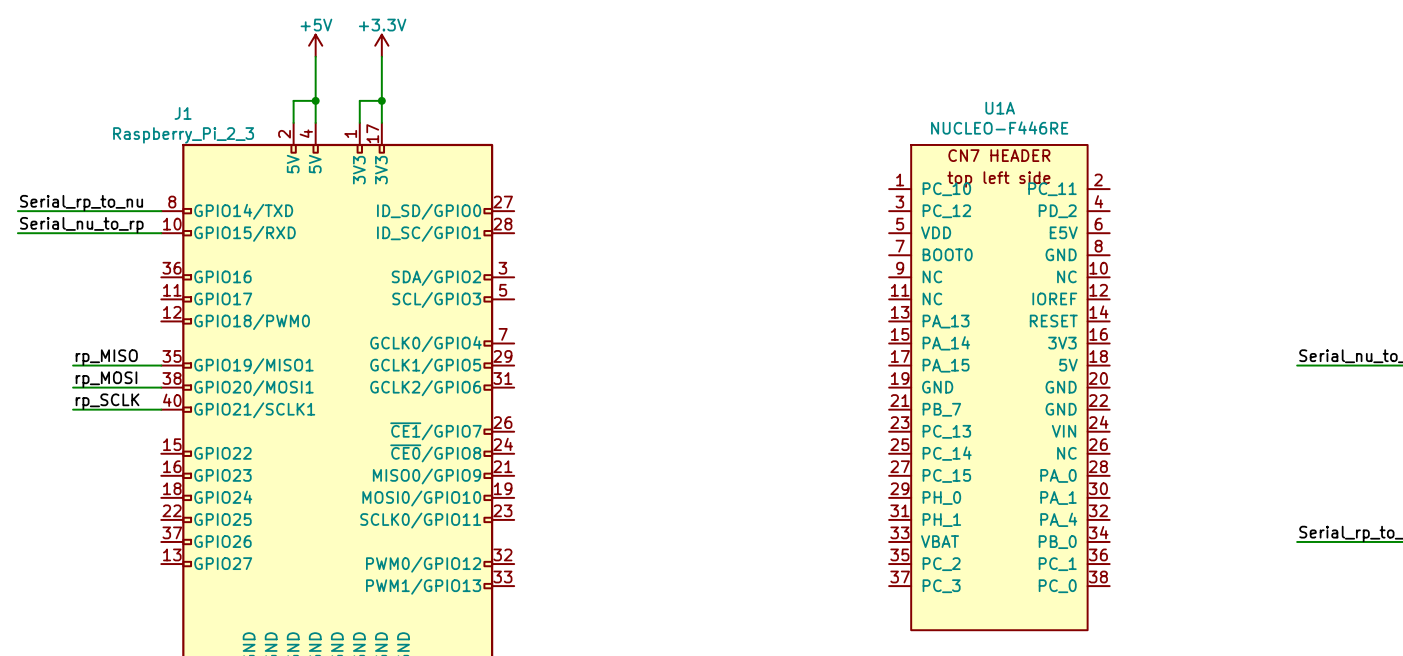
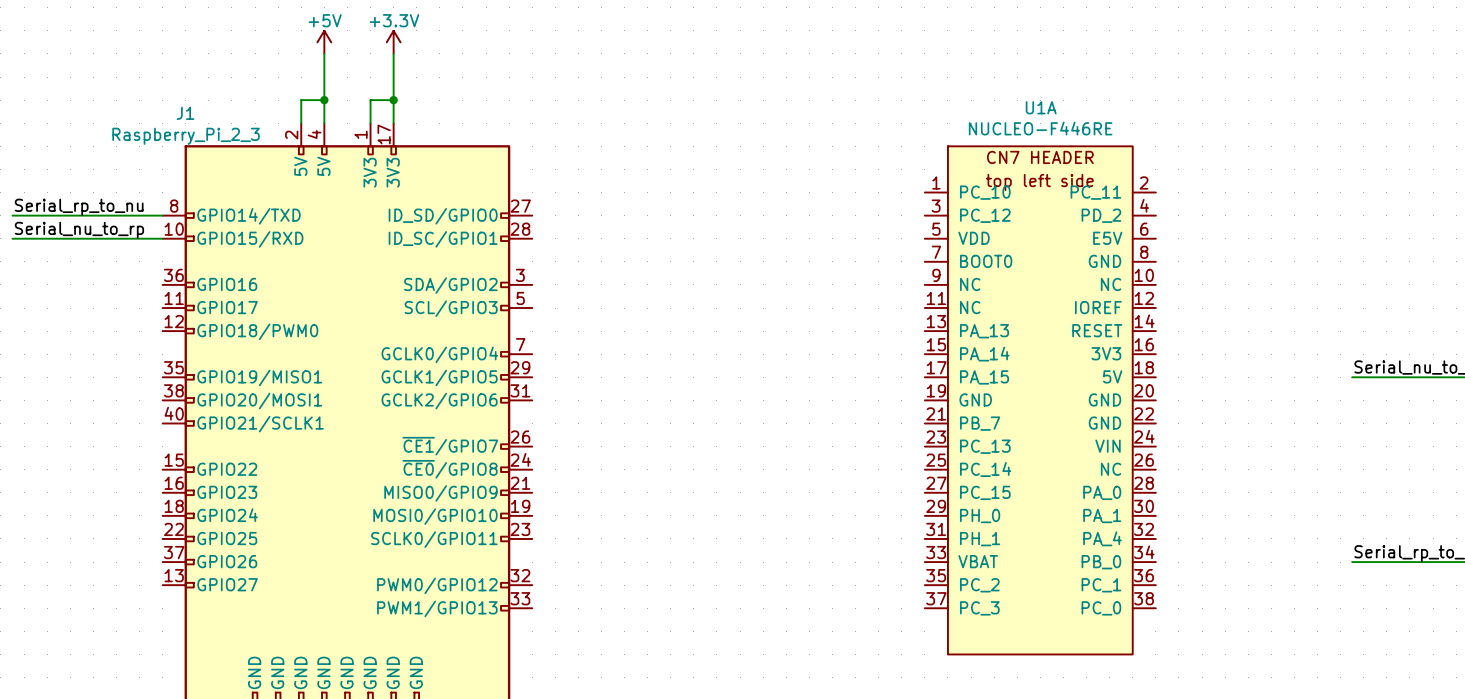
label: rp_MISO (106, 357) -> none
wire: (73, 365) (161, 365) -> none
label: rp_MOSI (106, 379) -> none
wire: (73, 387) (161, 387) -> none
label: rp_SCLK (107, 401) -> none
wire: (73, 409) (161, 409) -> none

